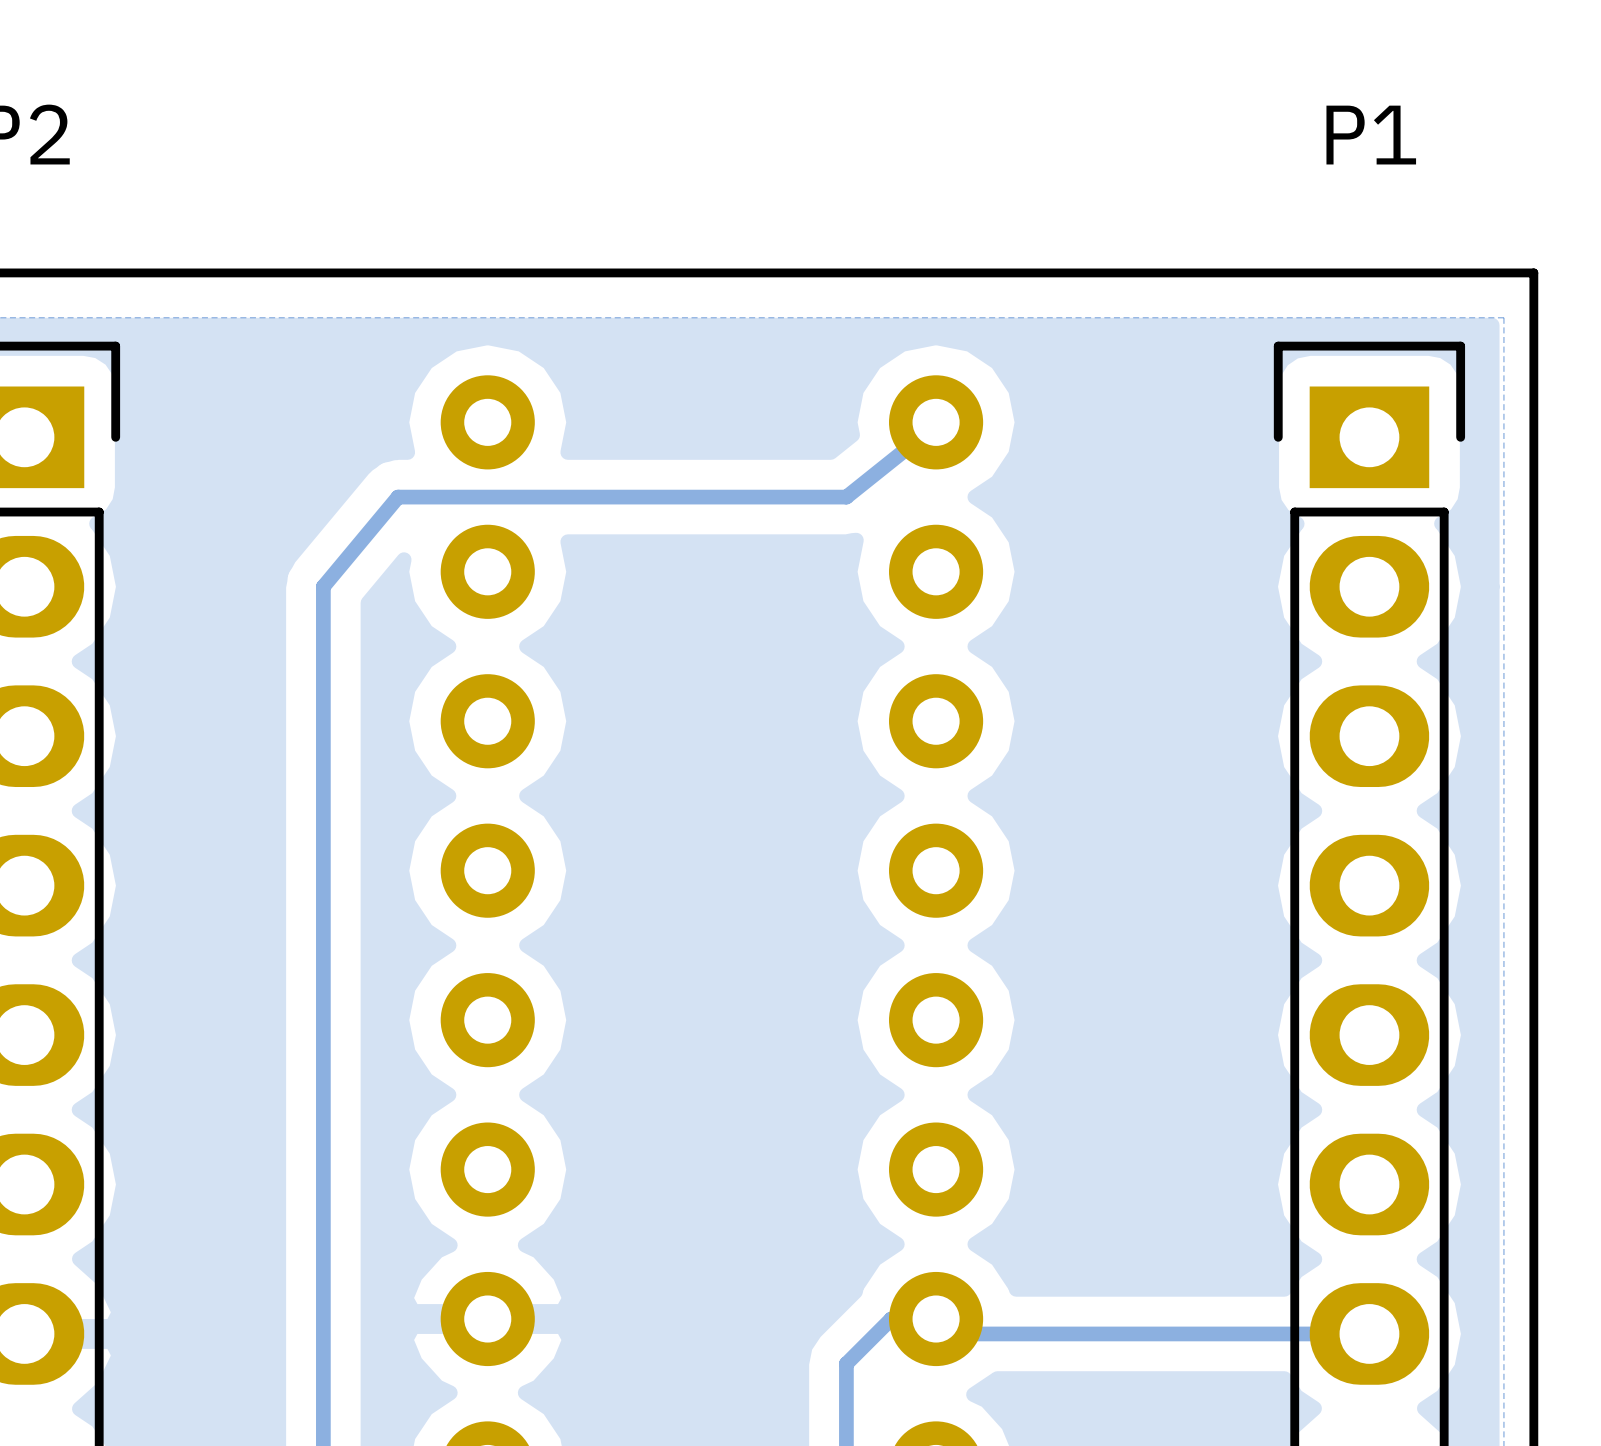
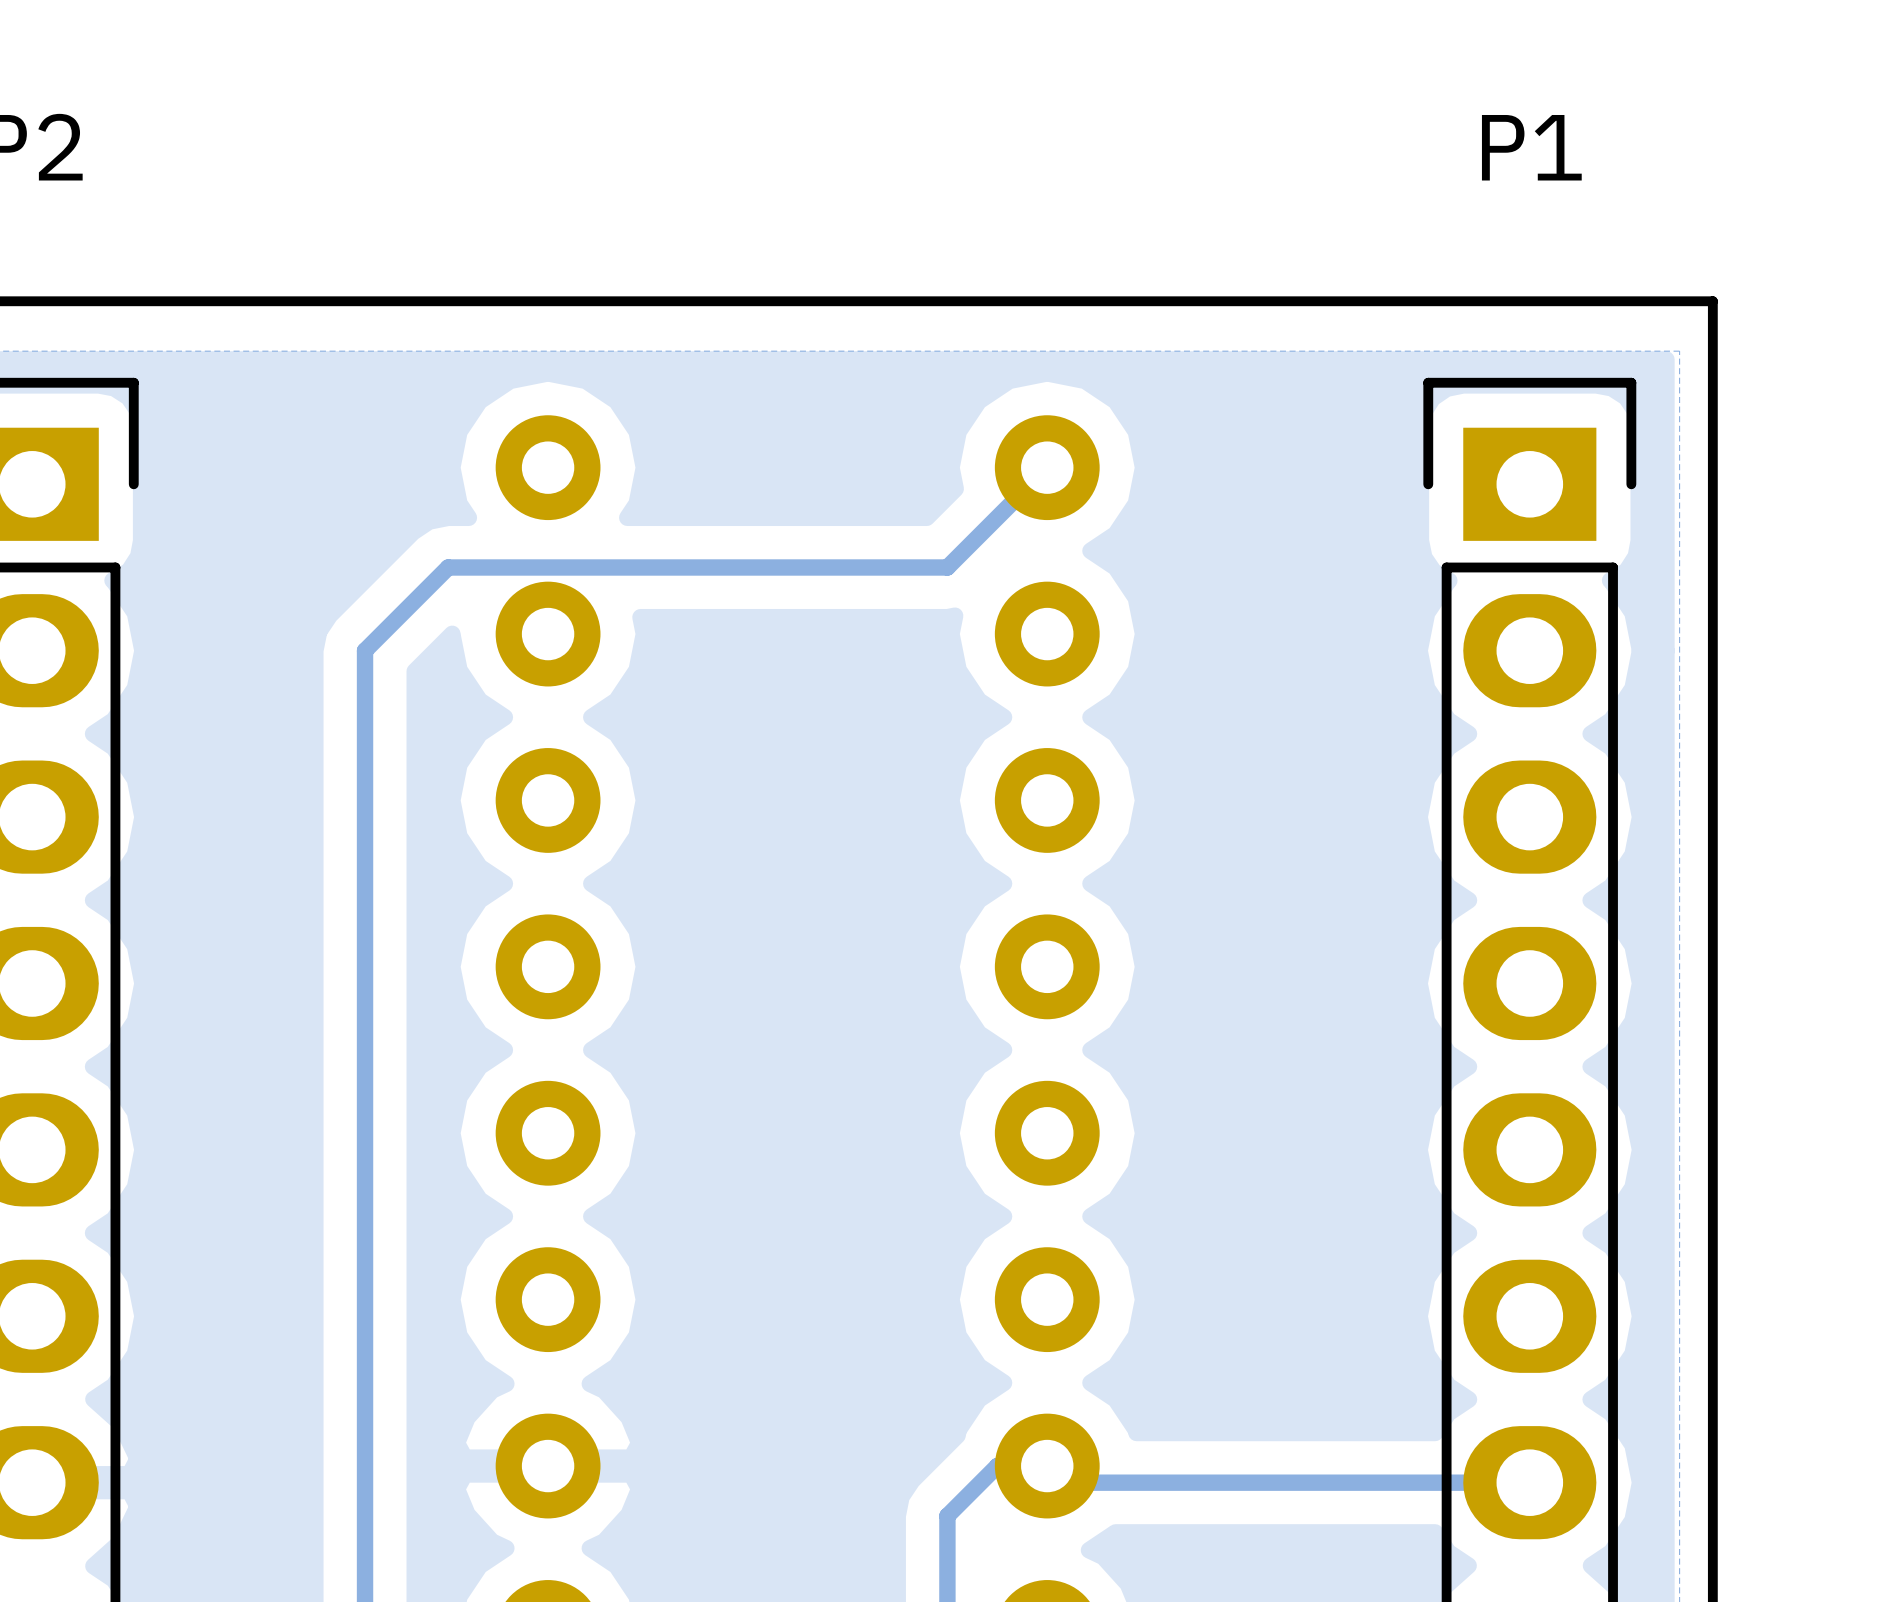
track: (921, 437) (846, 497) (398, 497) (323, 586) -> (1030, 484) (947, 567) (448, 567) (365, 650)

